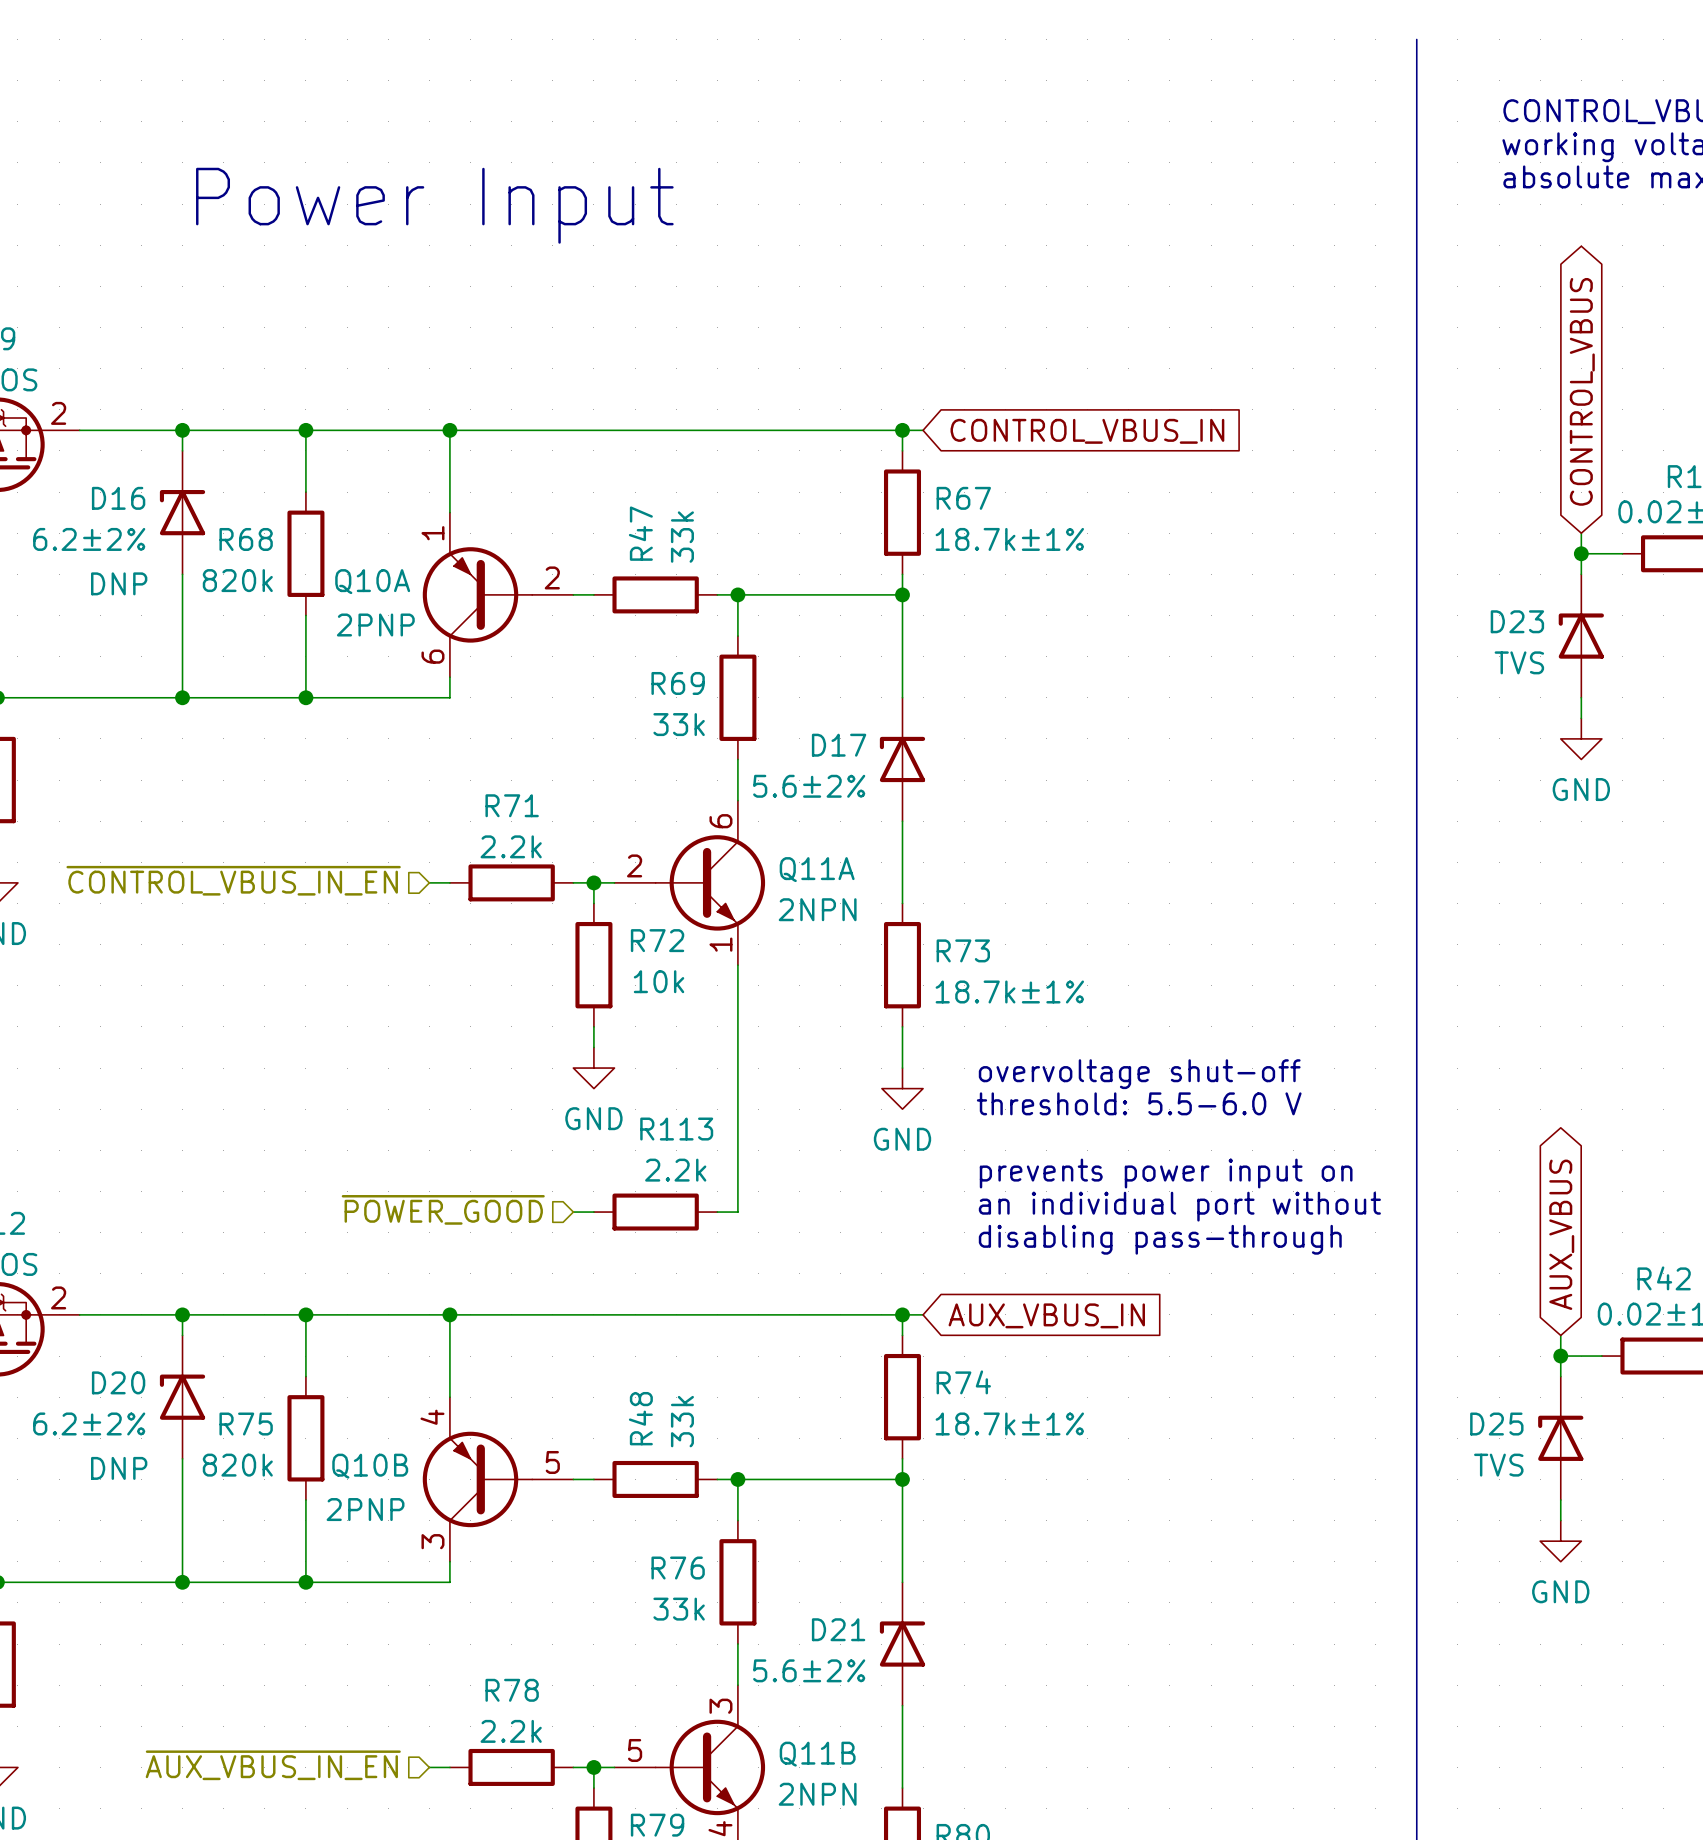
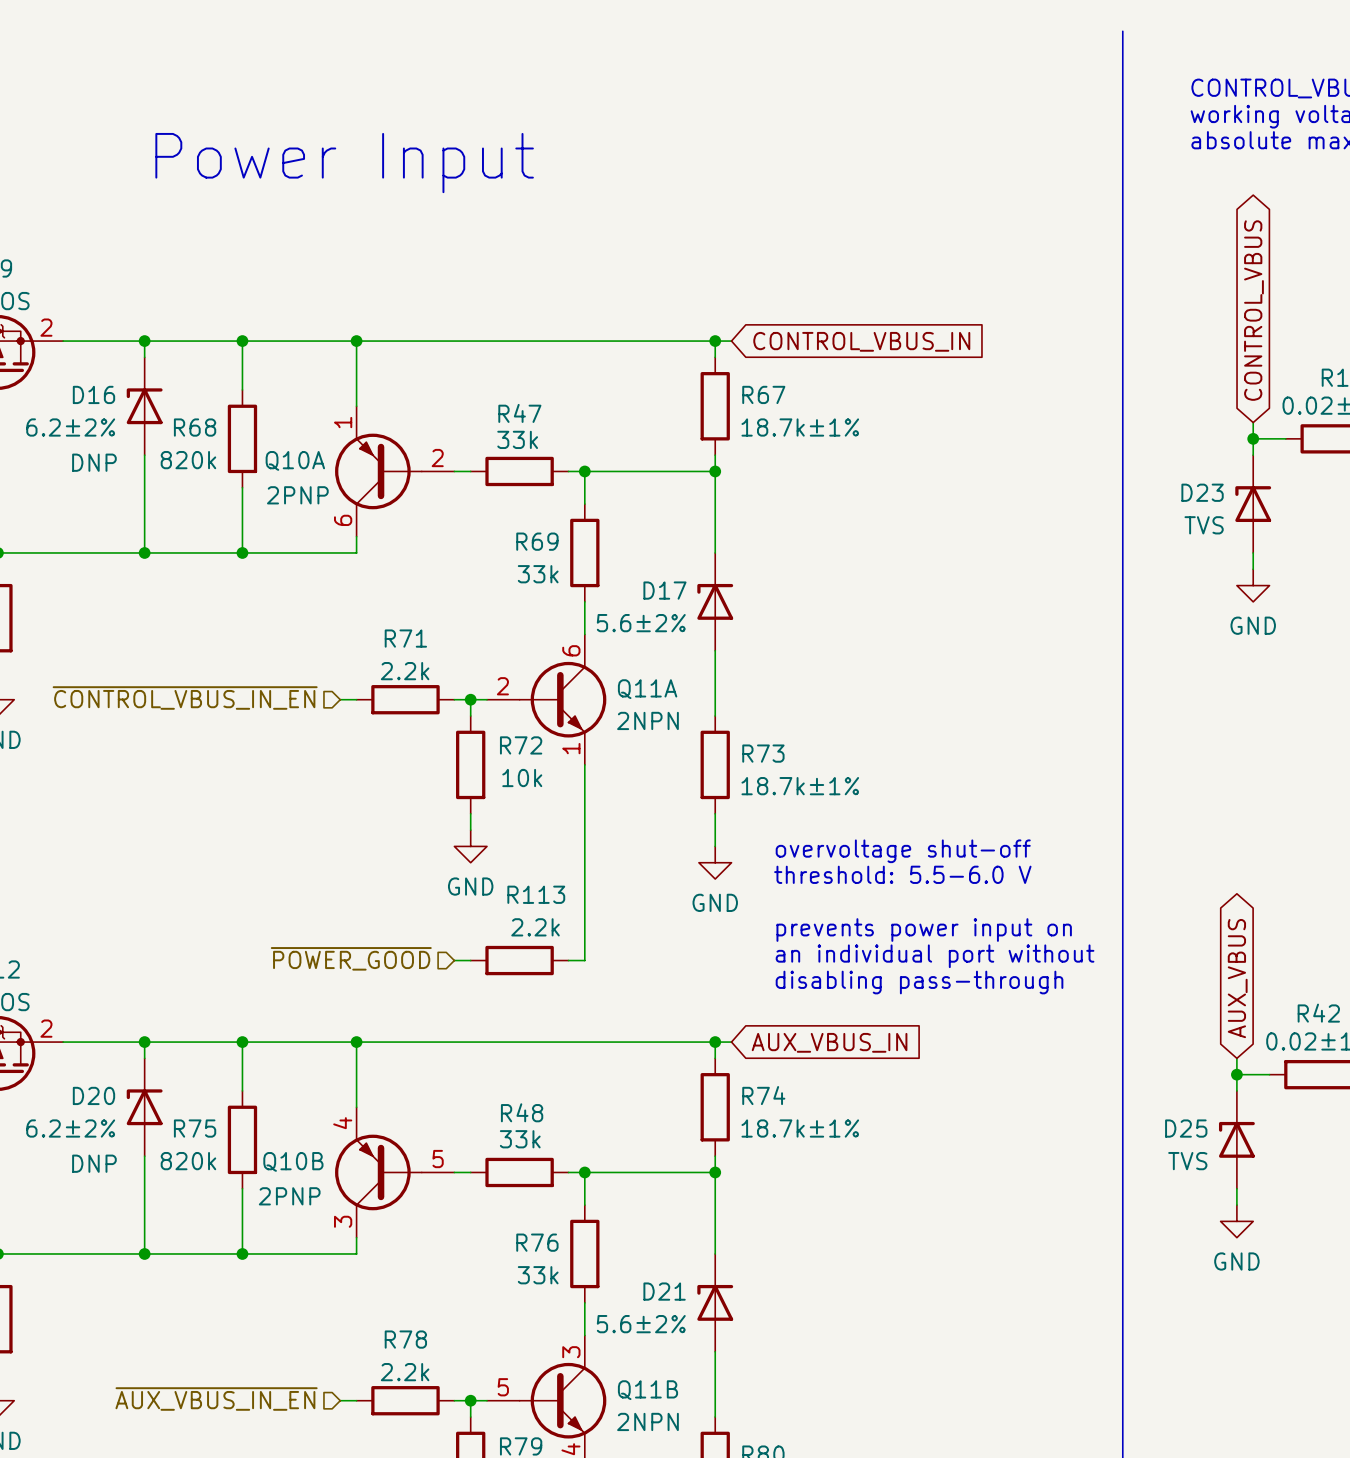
R47 name rotation: 0° (640, 533) -> 90° clockwise (519, 413)
R47 value rotation: 0° (682, 537) -> 90° clockwise (517, 439)
R48 name rotation: 0° (640, 1418) -> 90° clockwise (522, 1112)
R48 value rotation: 0° (682, 1421) -> 90° clockwise (520, 1139)

